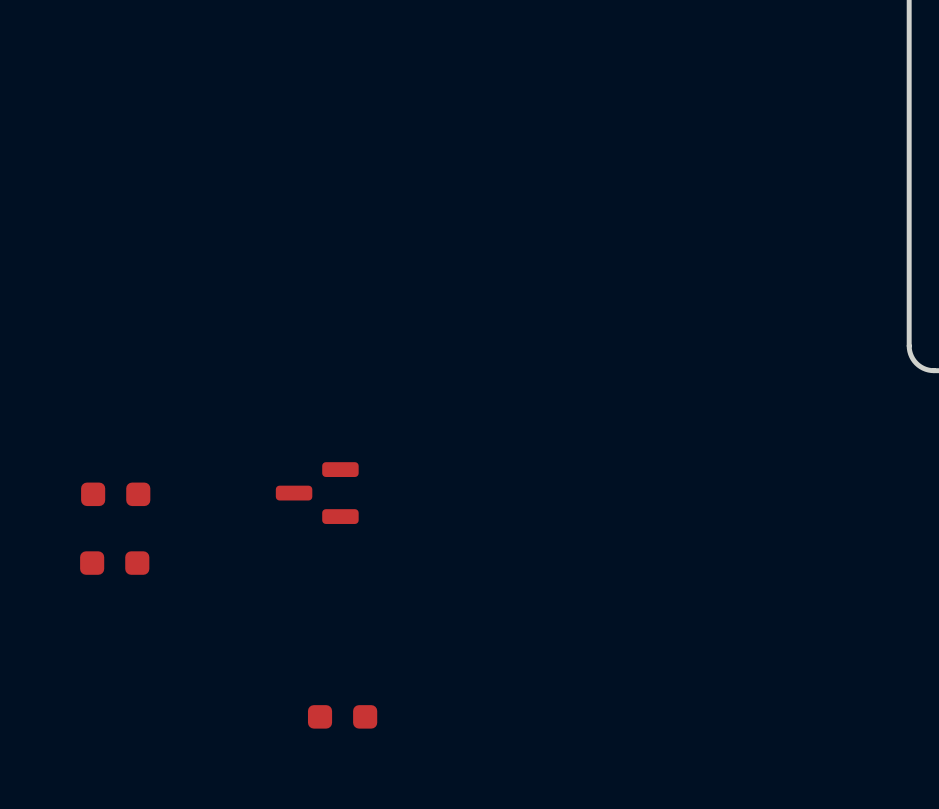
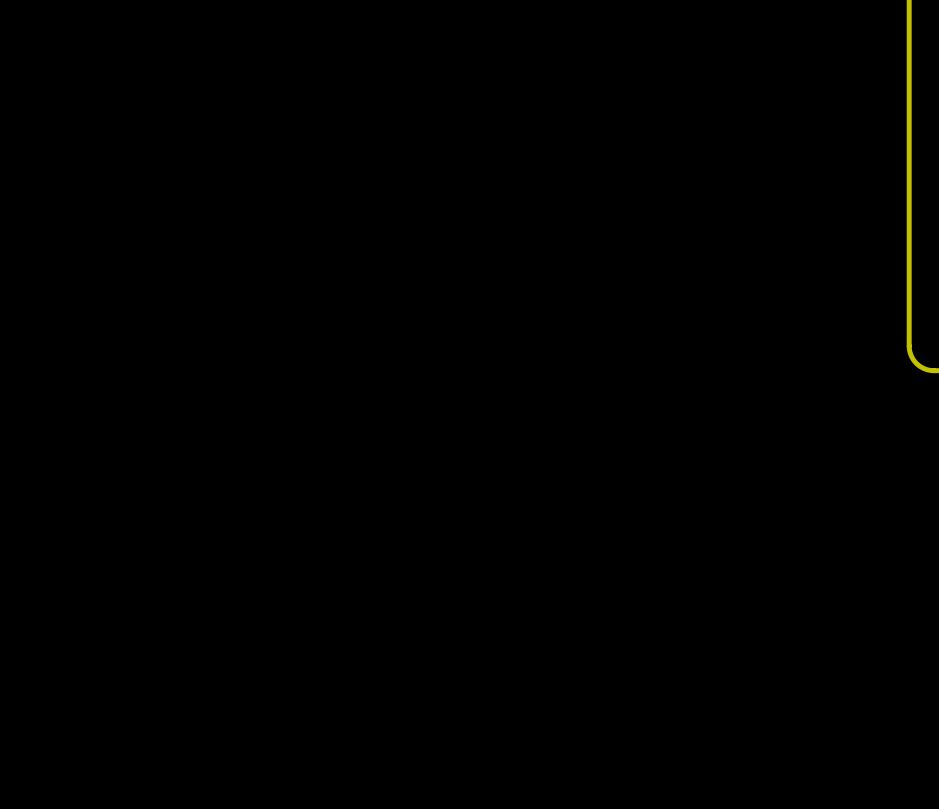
part: (317, 493) -> none
part: (115, 494) -> none
part: (114, 563) -> none
part: (342, 716) -> none

